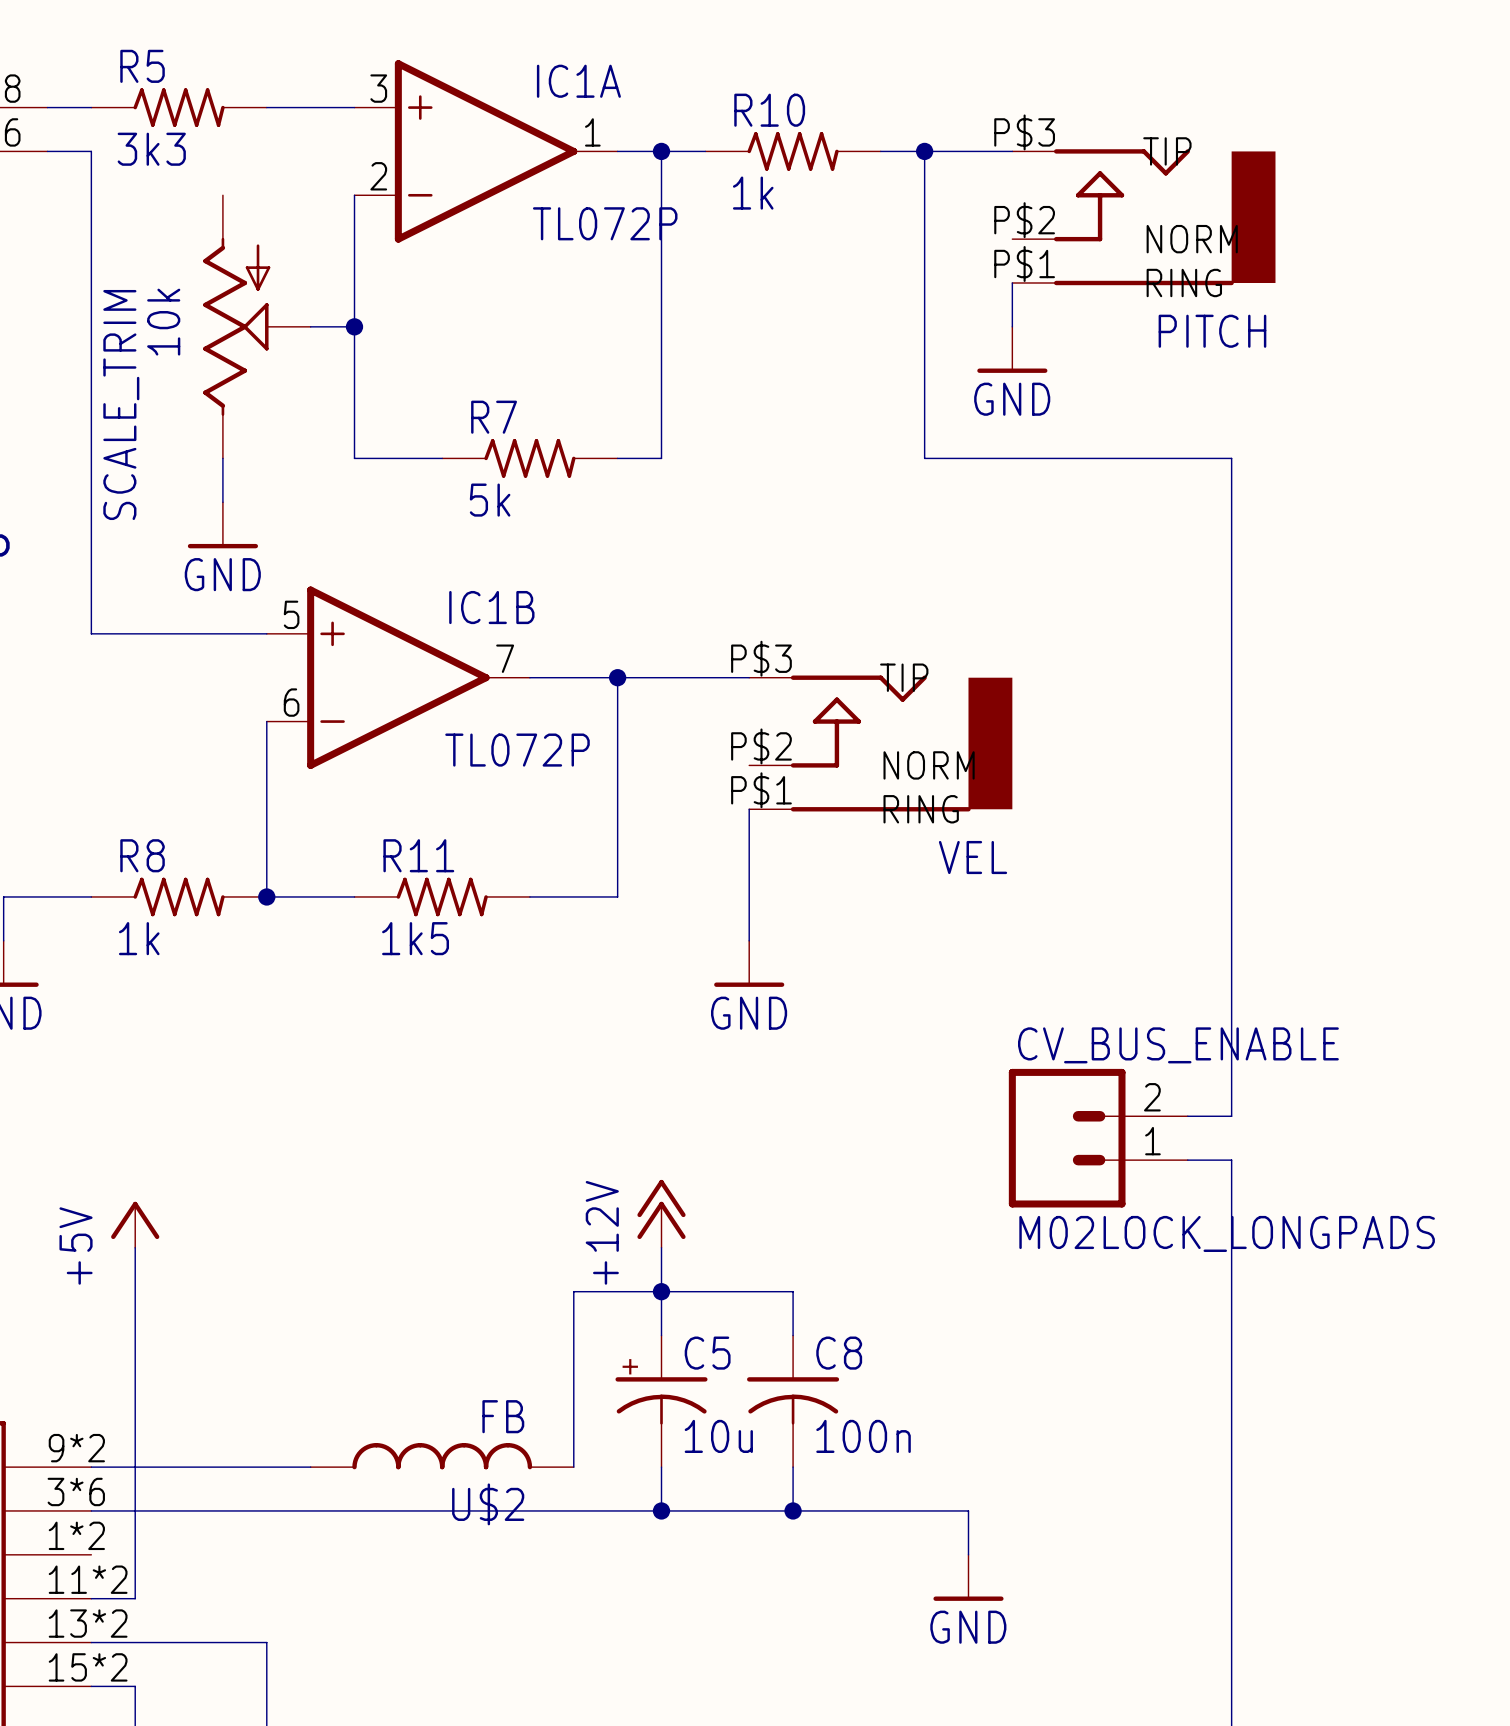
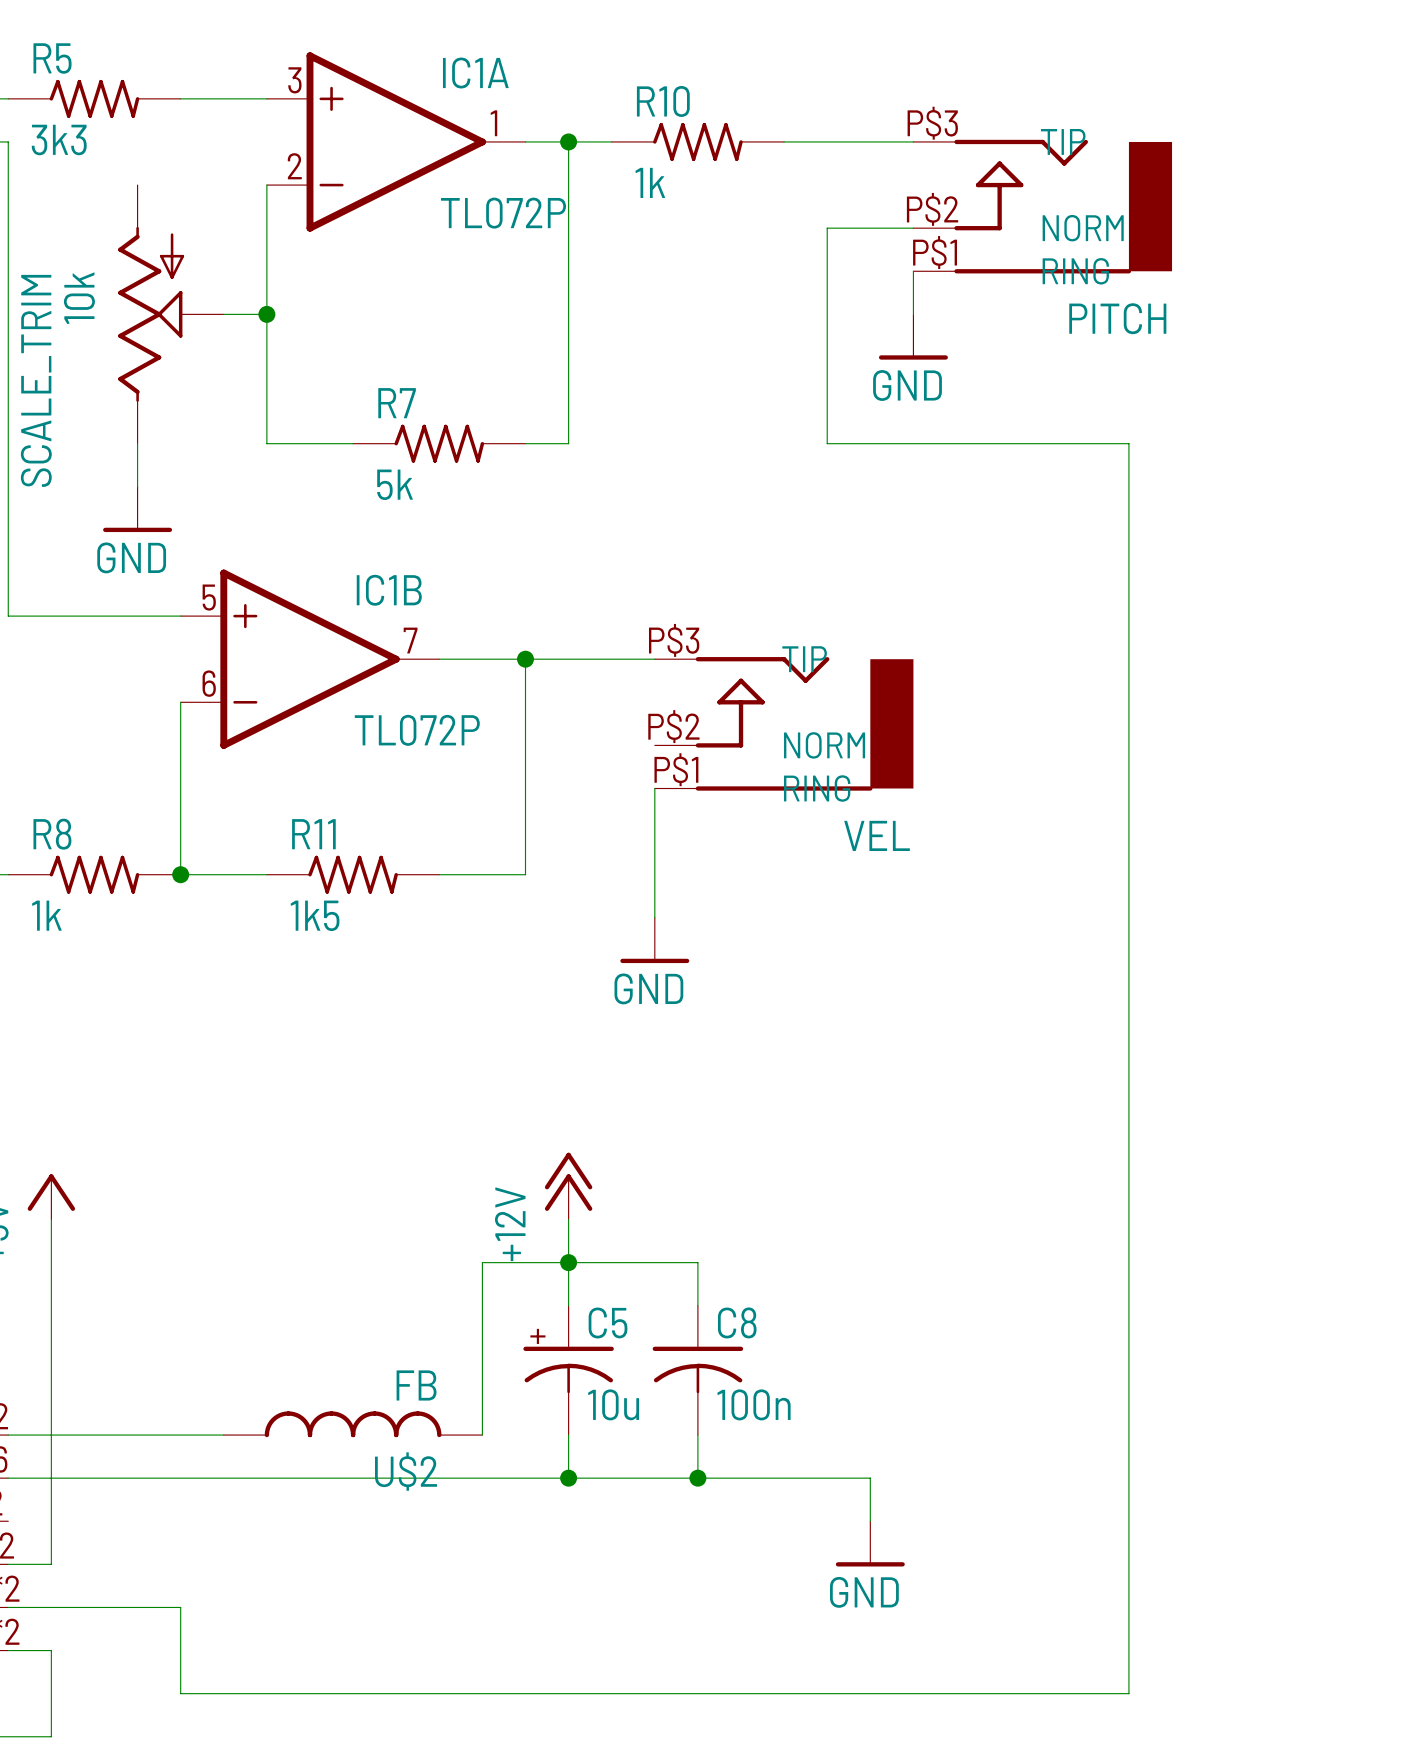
wire: (924, 151) (924, 239) -> (913, 228) (827, 228)
junction: (924, 151) -> none
wire: (1187, 1116) (1231, 1116) -> (1128, 1133) (1128, 1090)
CV_BUS_ENABLE: M02LOCK_LONGPADS (1098, 1138) -> none
wire: (1187, 1160) (1231, 1160) -> none

